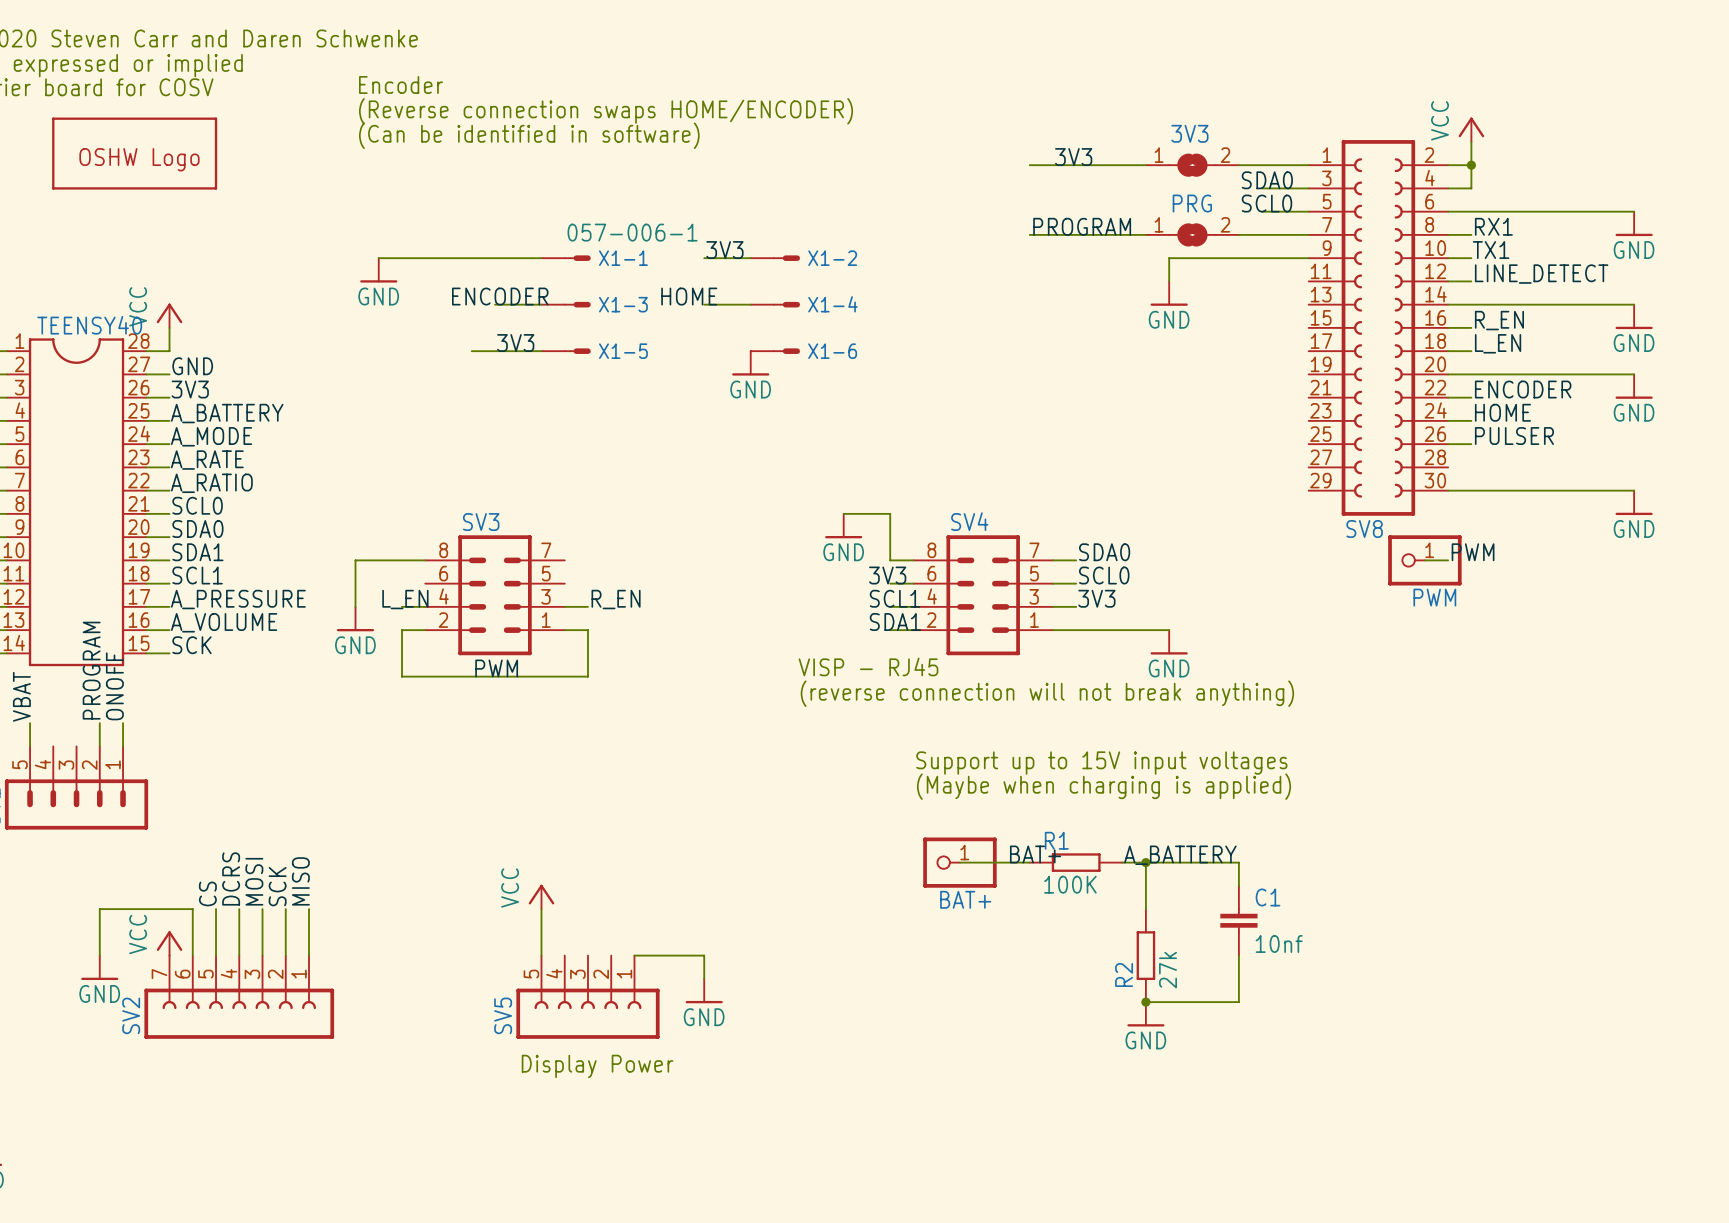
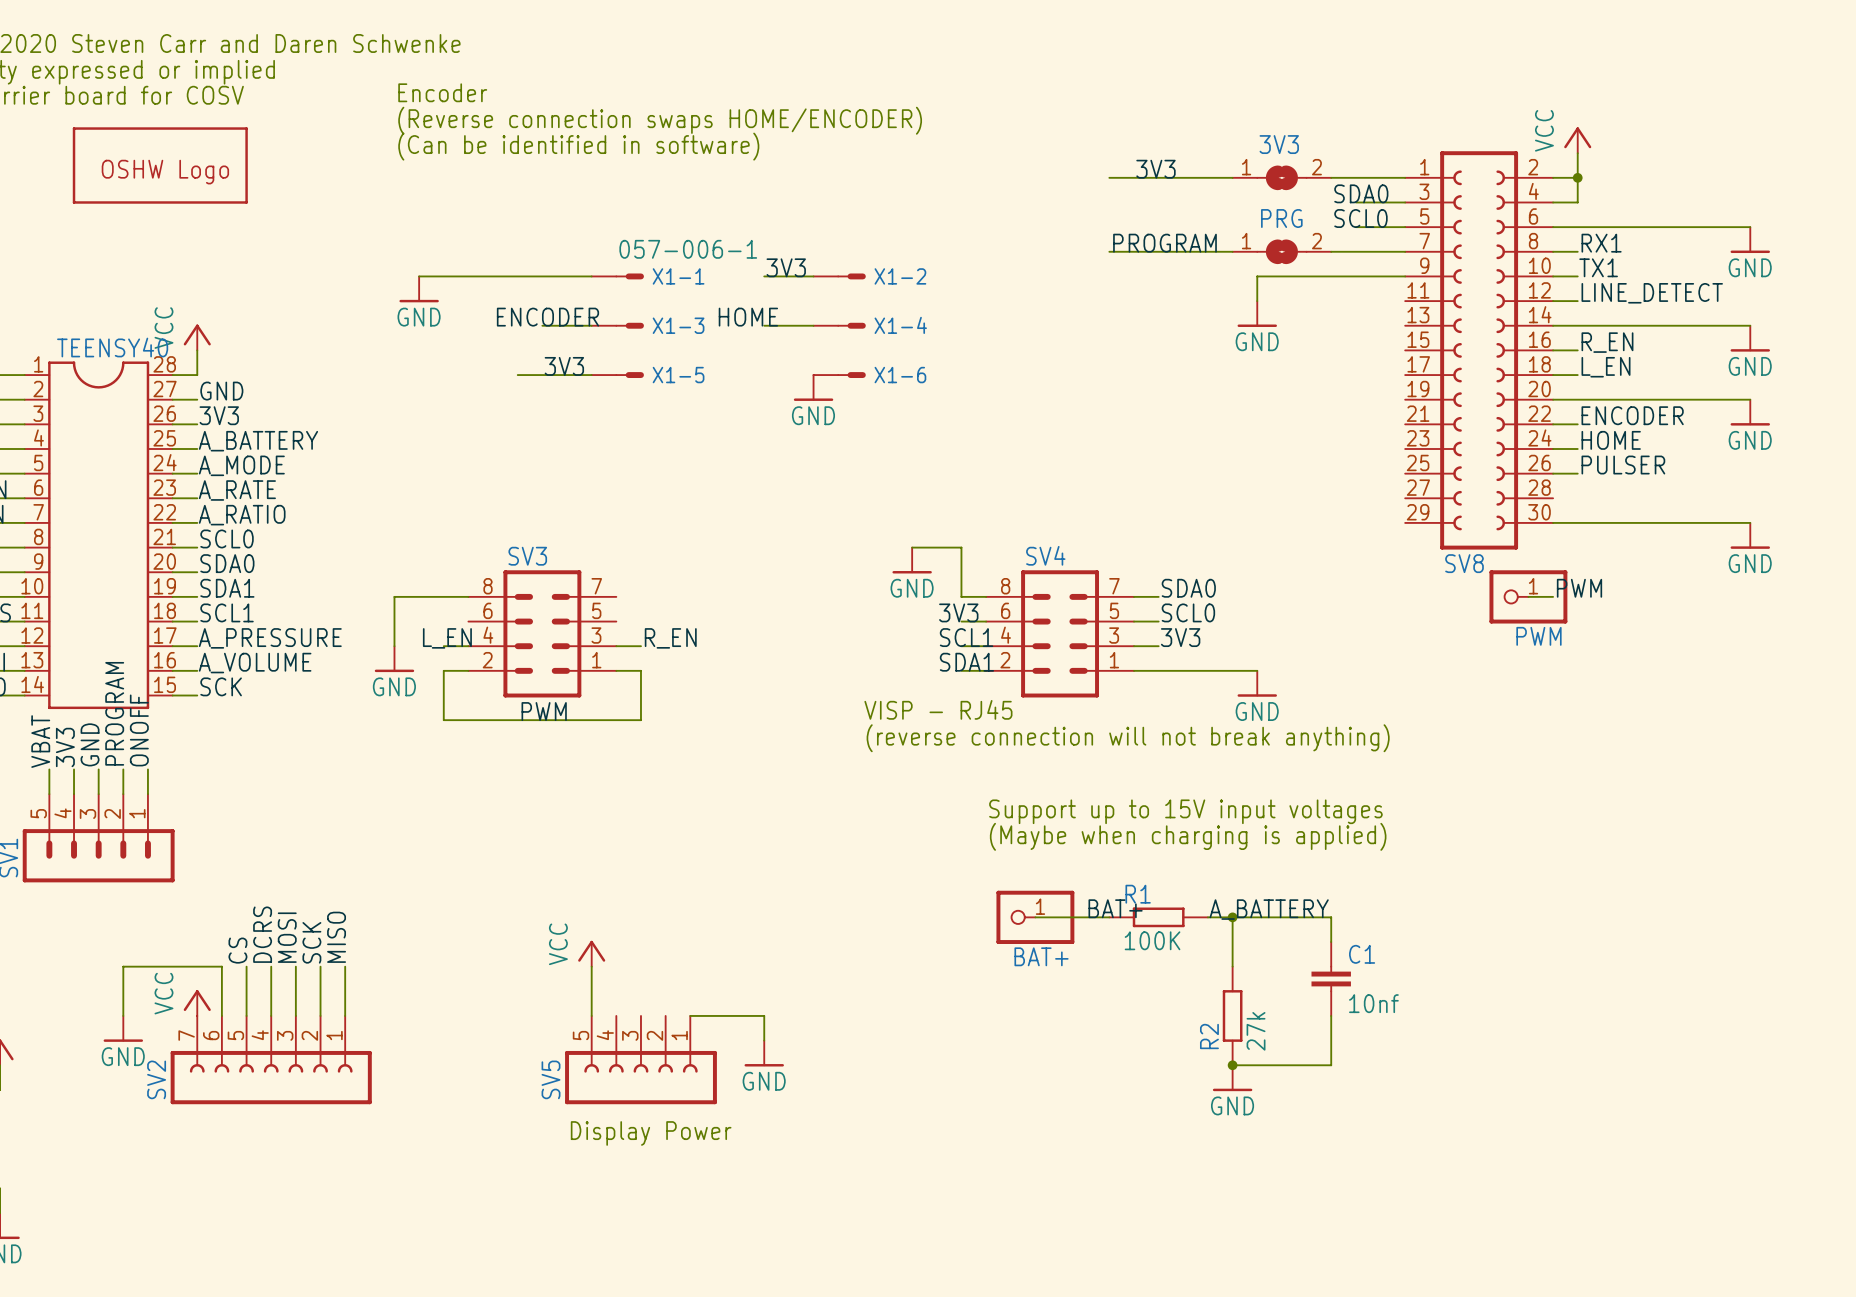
label: none -> GND (90, 744)
label: none -> 3V3 (65, 747)
wire: none -> (74, 769) (74, 794)
wire: none -> (98, 769) (98, 794)

